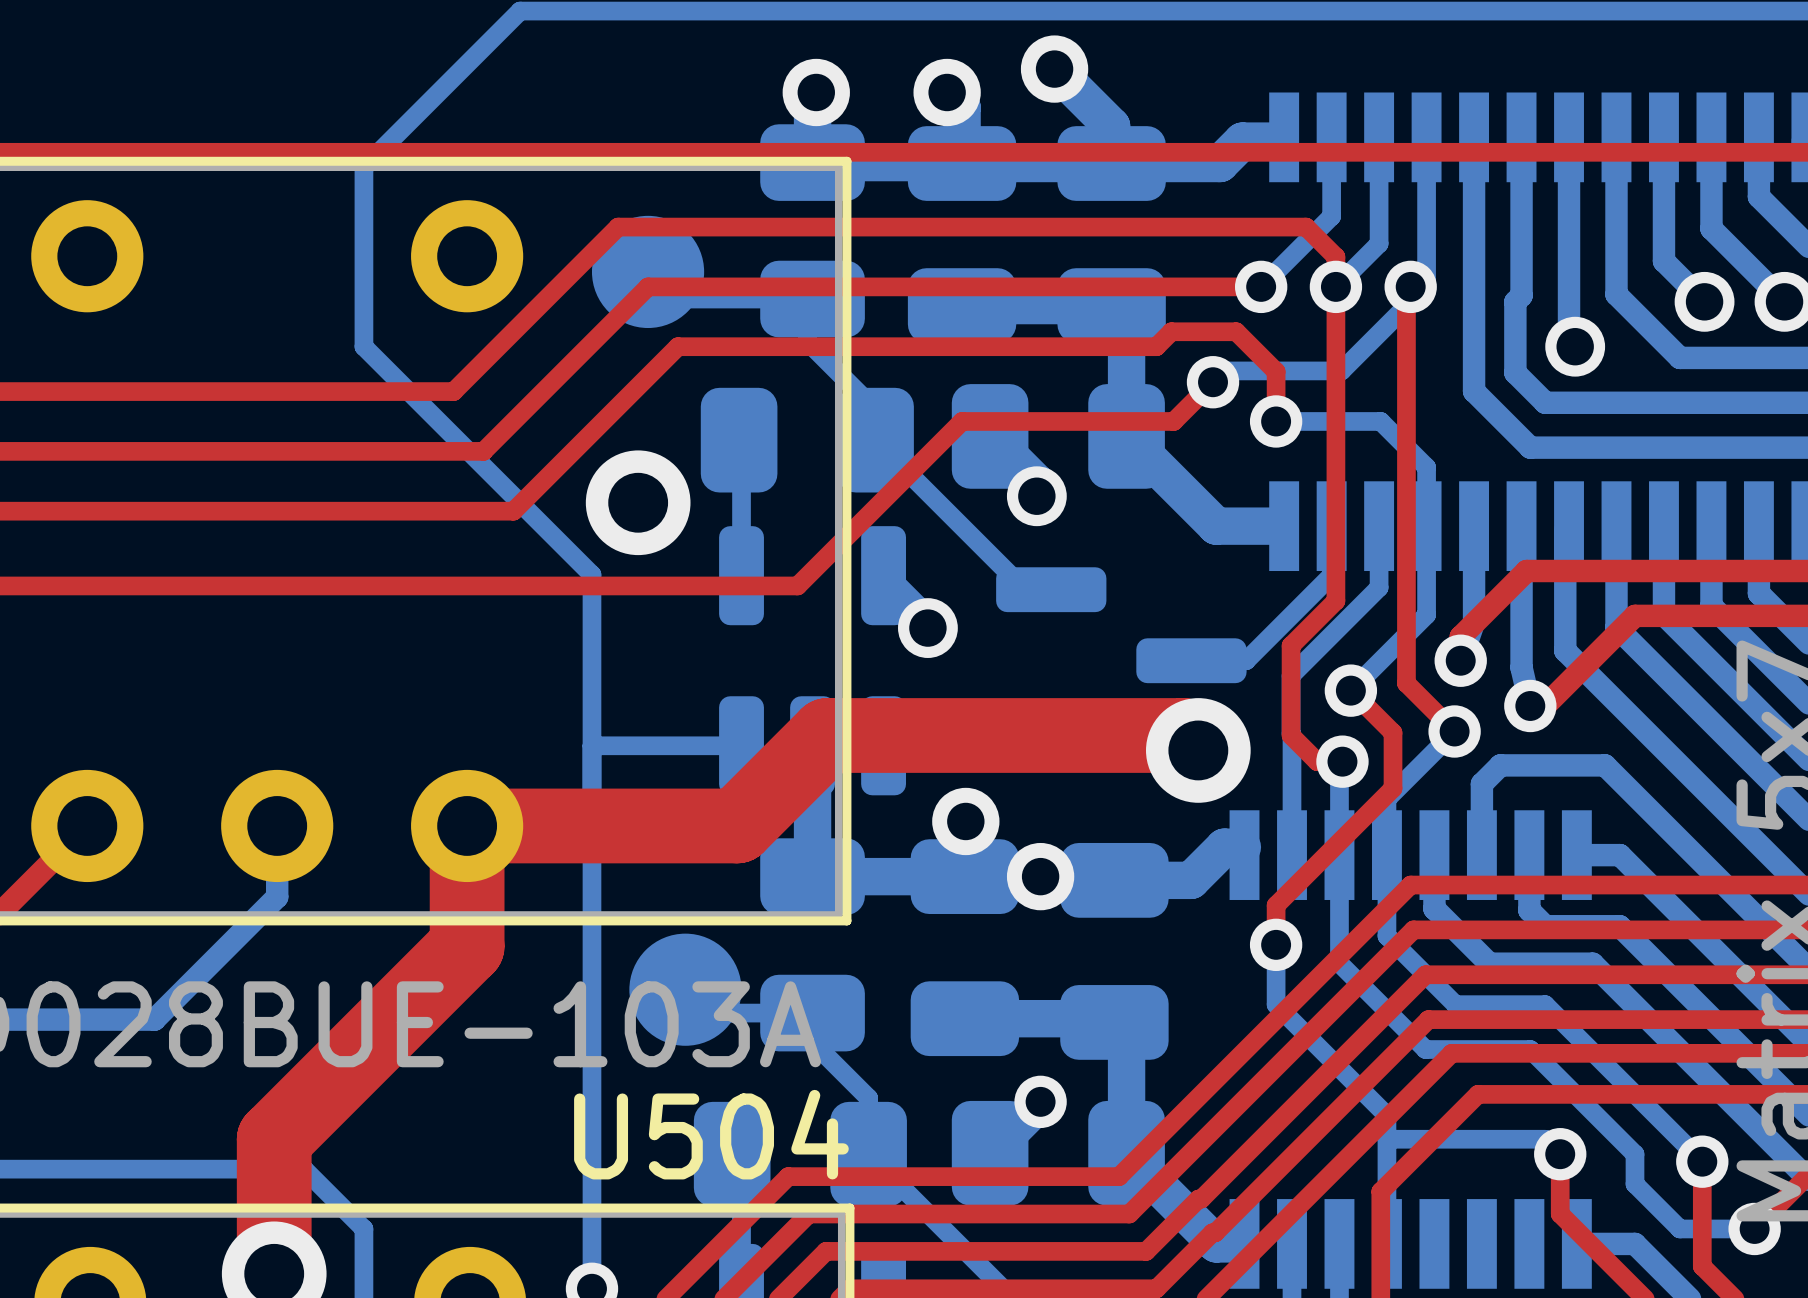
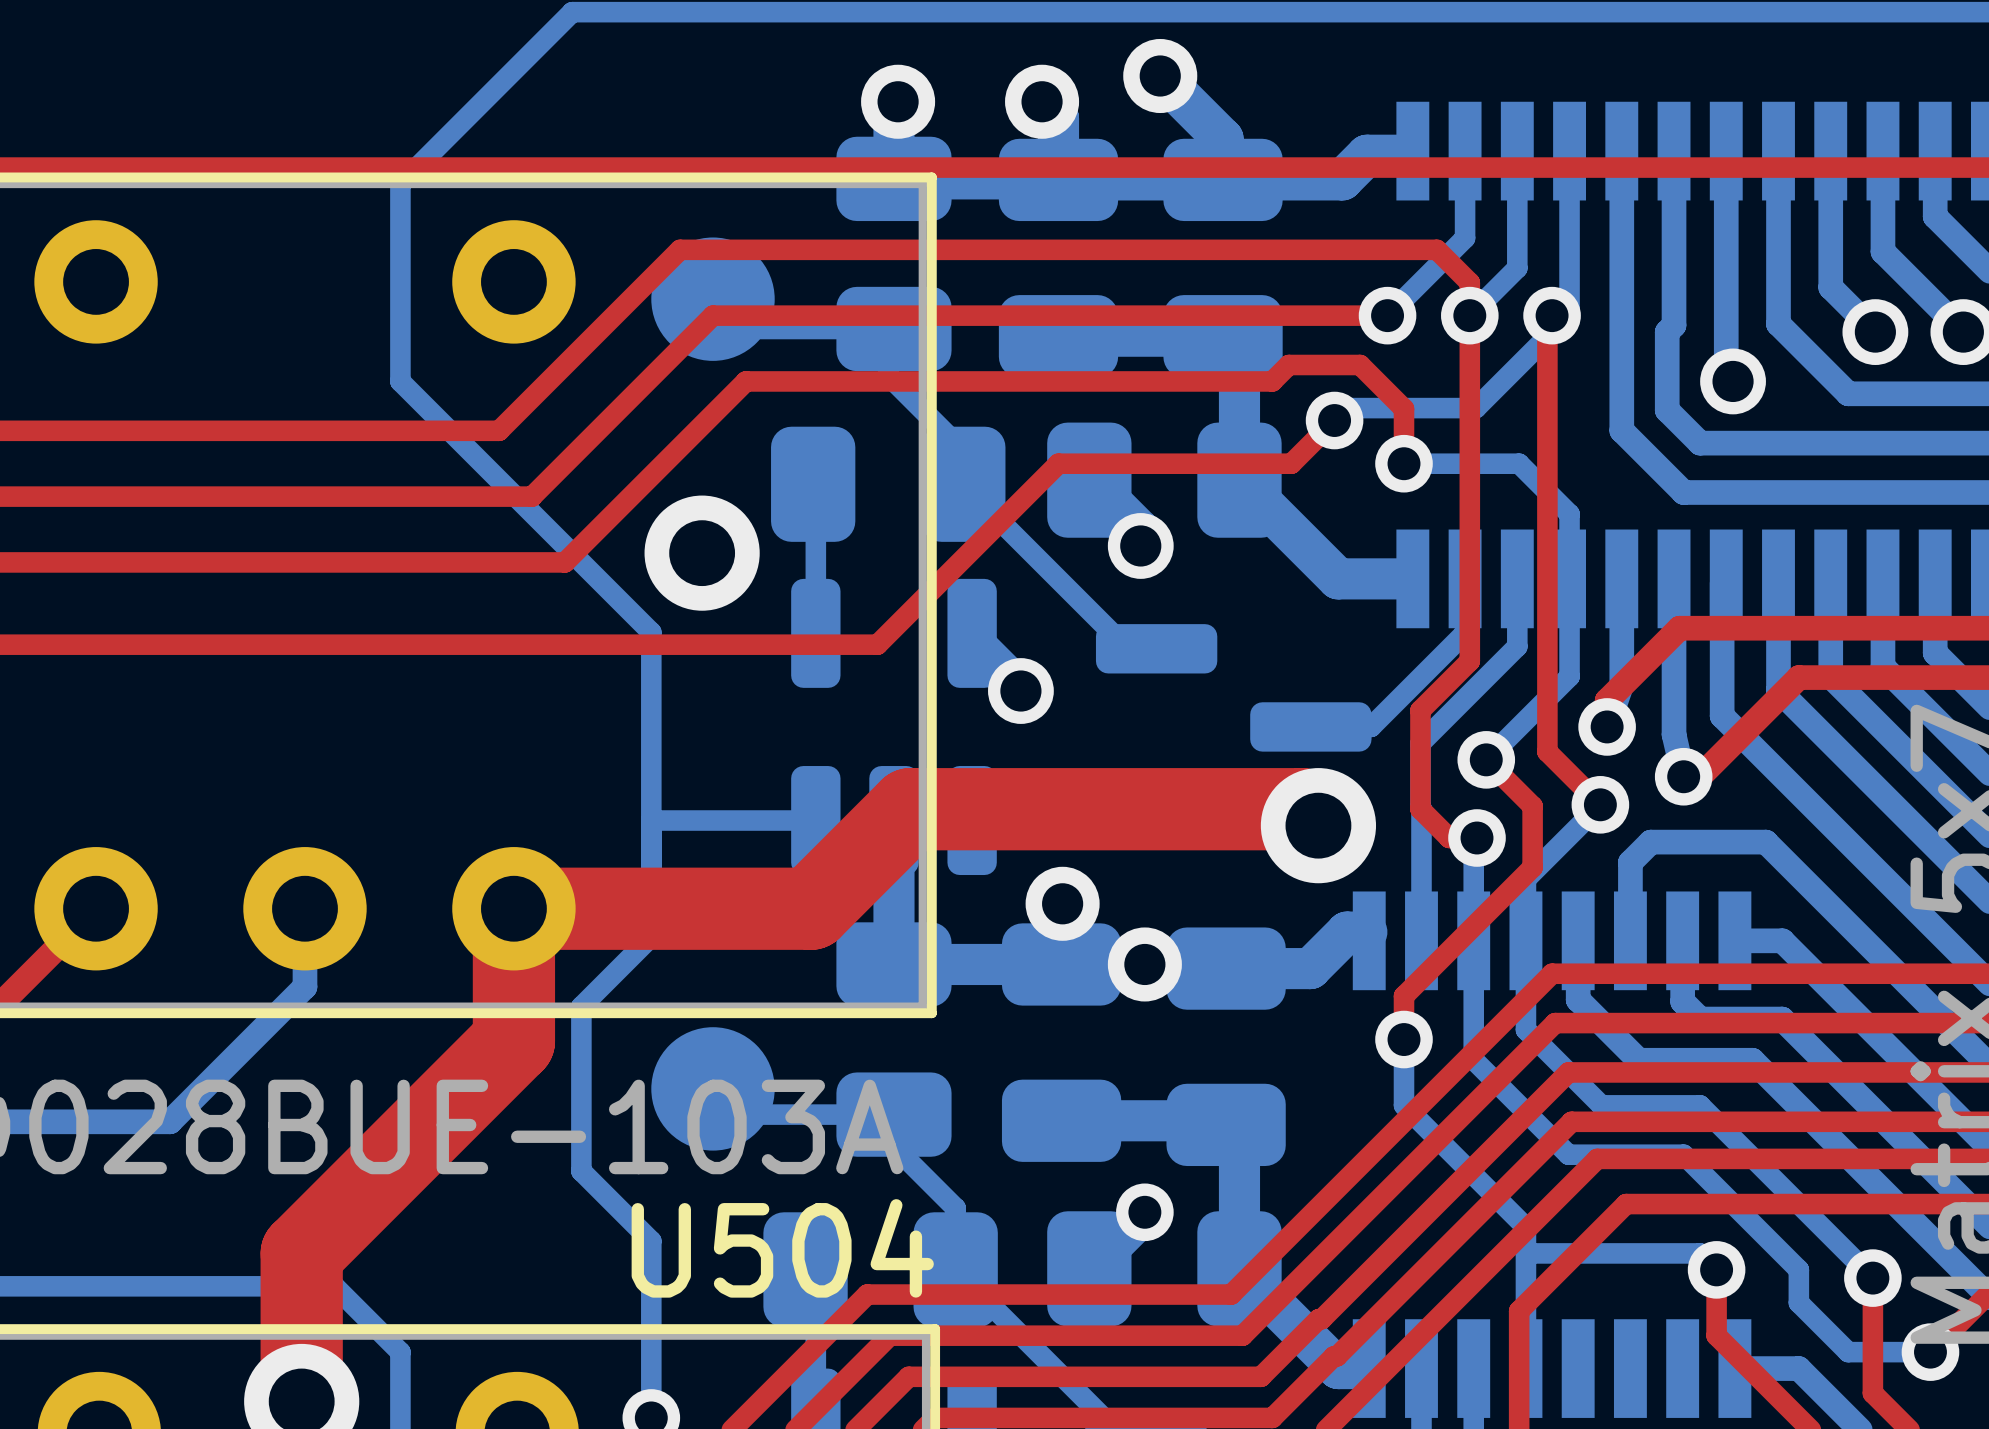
bottom track: (591, 851) (591, 1128) -> (651, 936) (581, 1006) (581, 1171) (651, 1241)
part position: (685, 989) -> (713, 1088)

